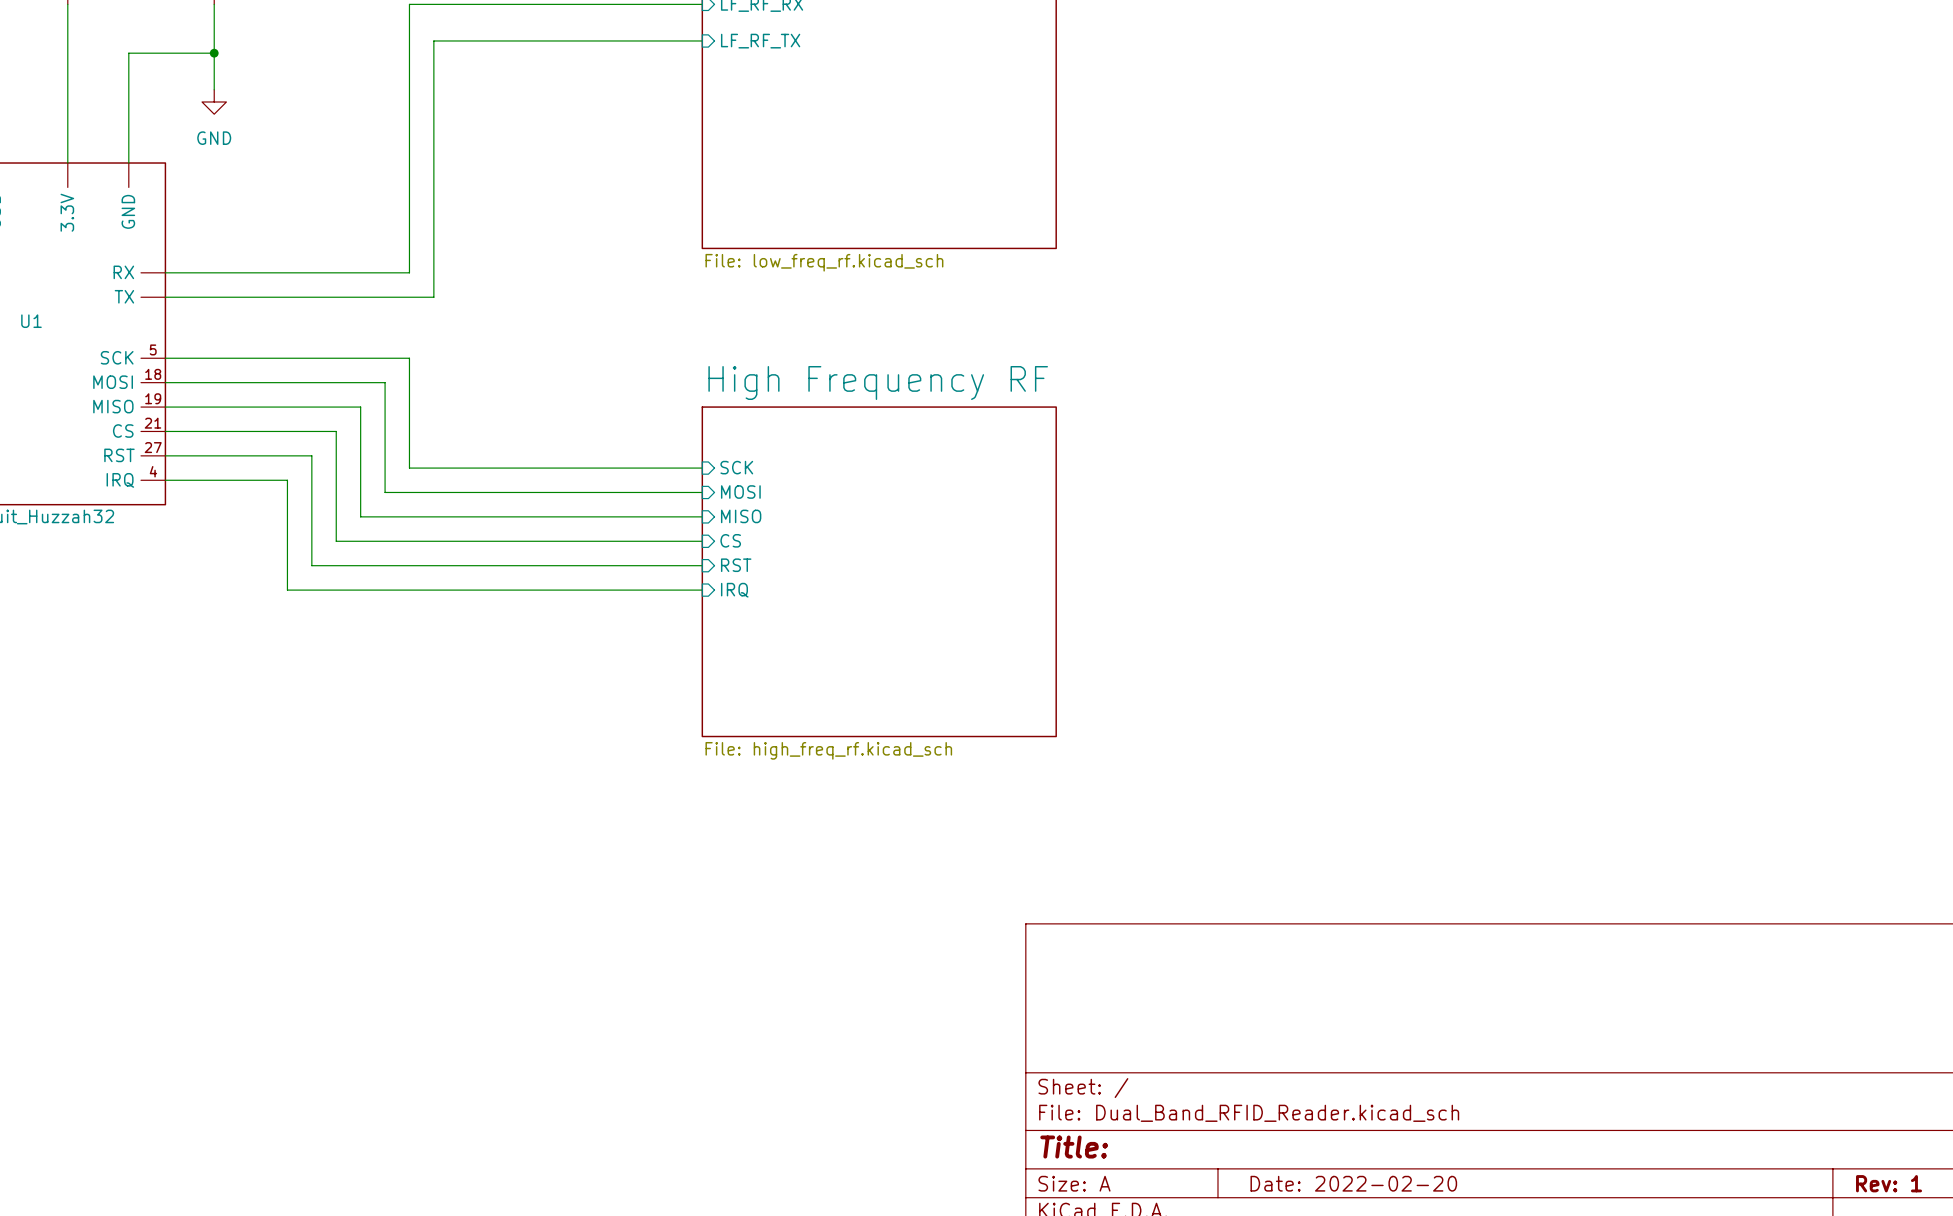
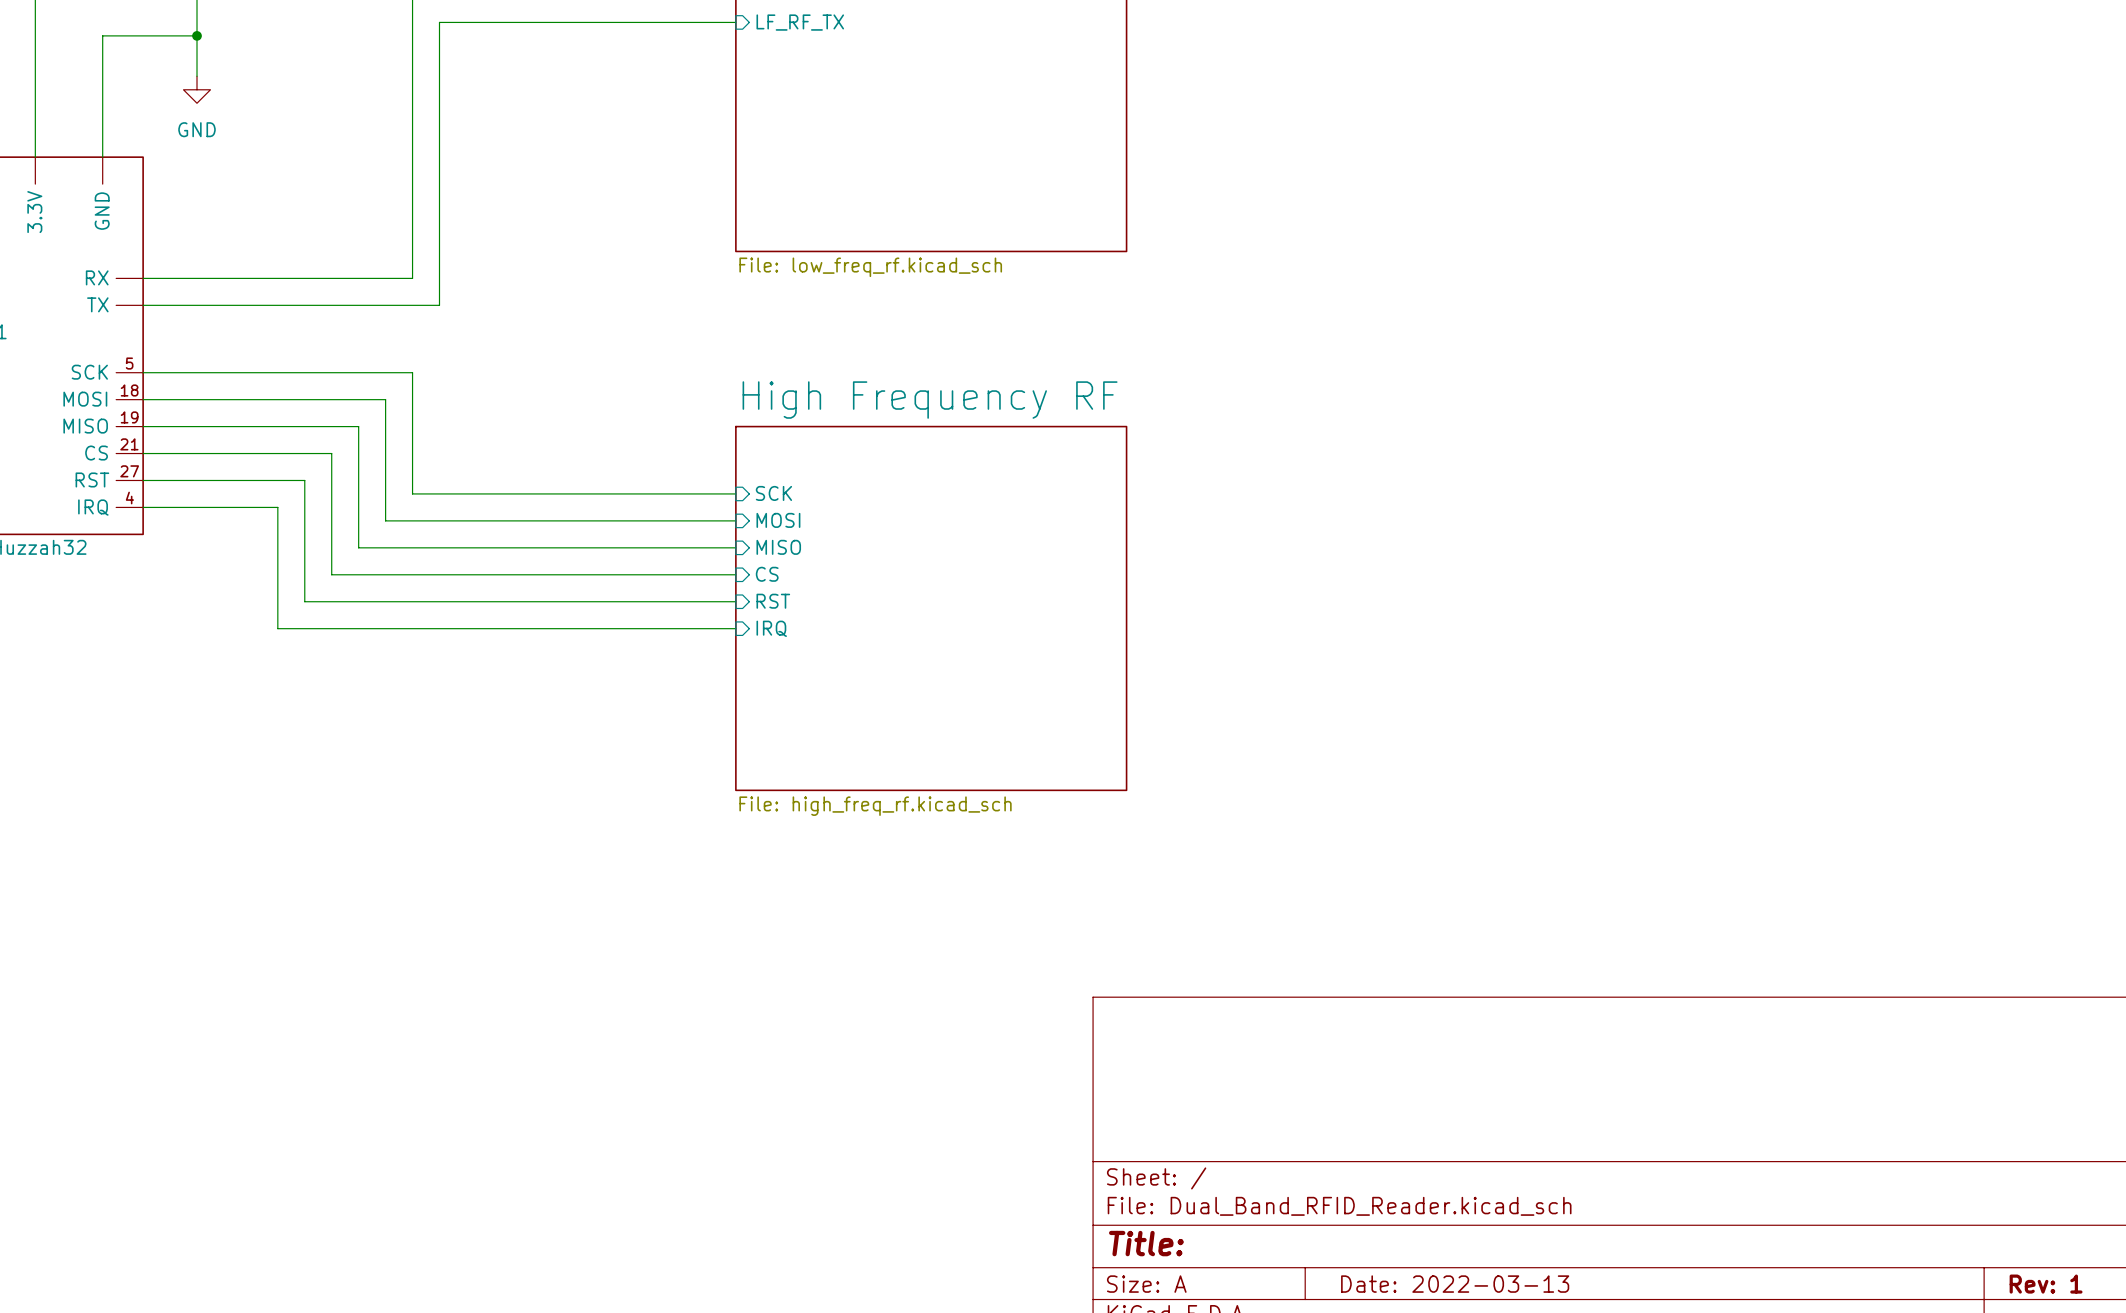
title block: Date: 2022-02-20 (1353, 1183) -> Date: 2022-03-13 (1455, 1284)

